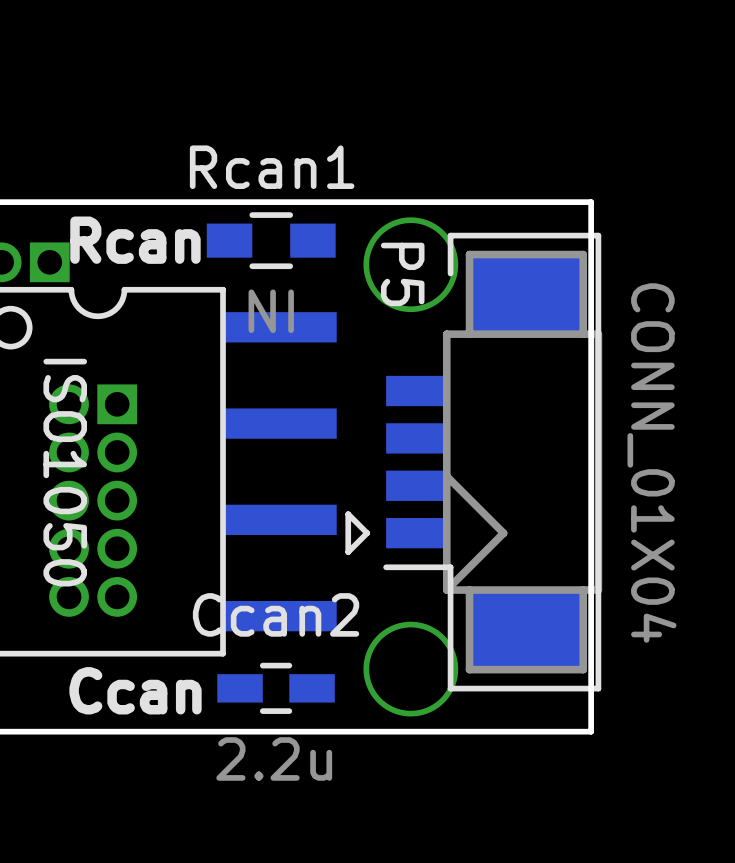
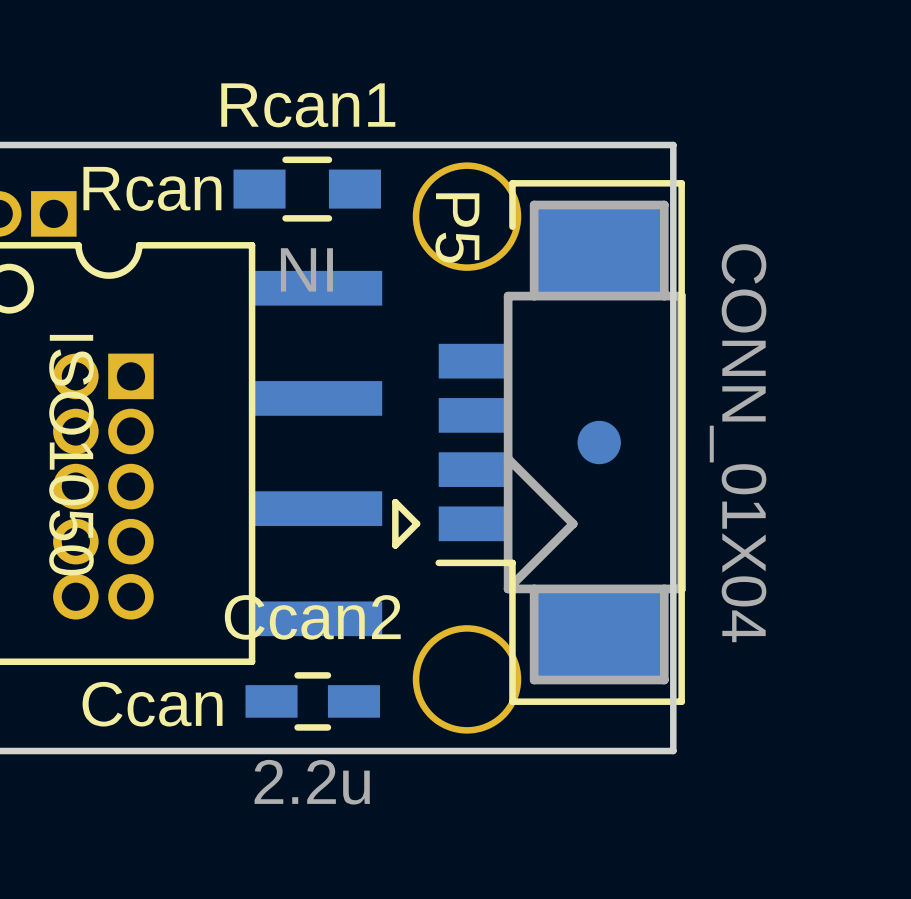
part: none -> (599, 442)

